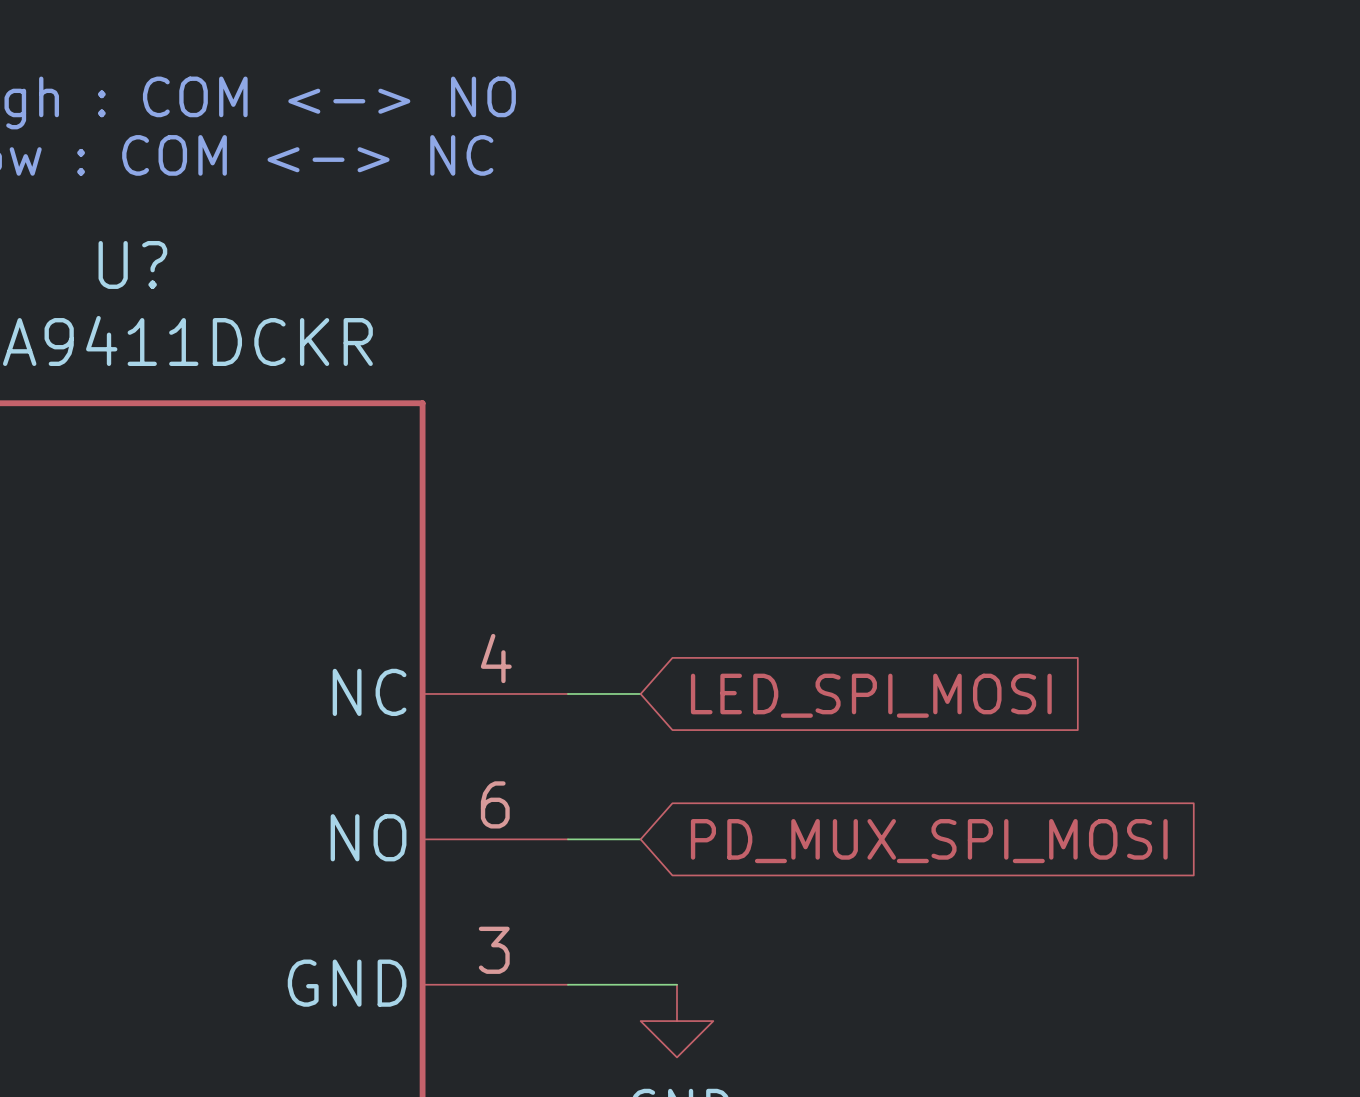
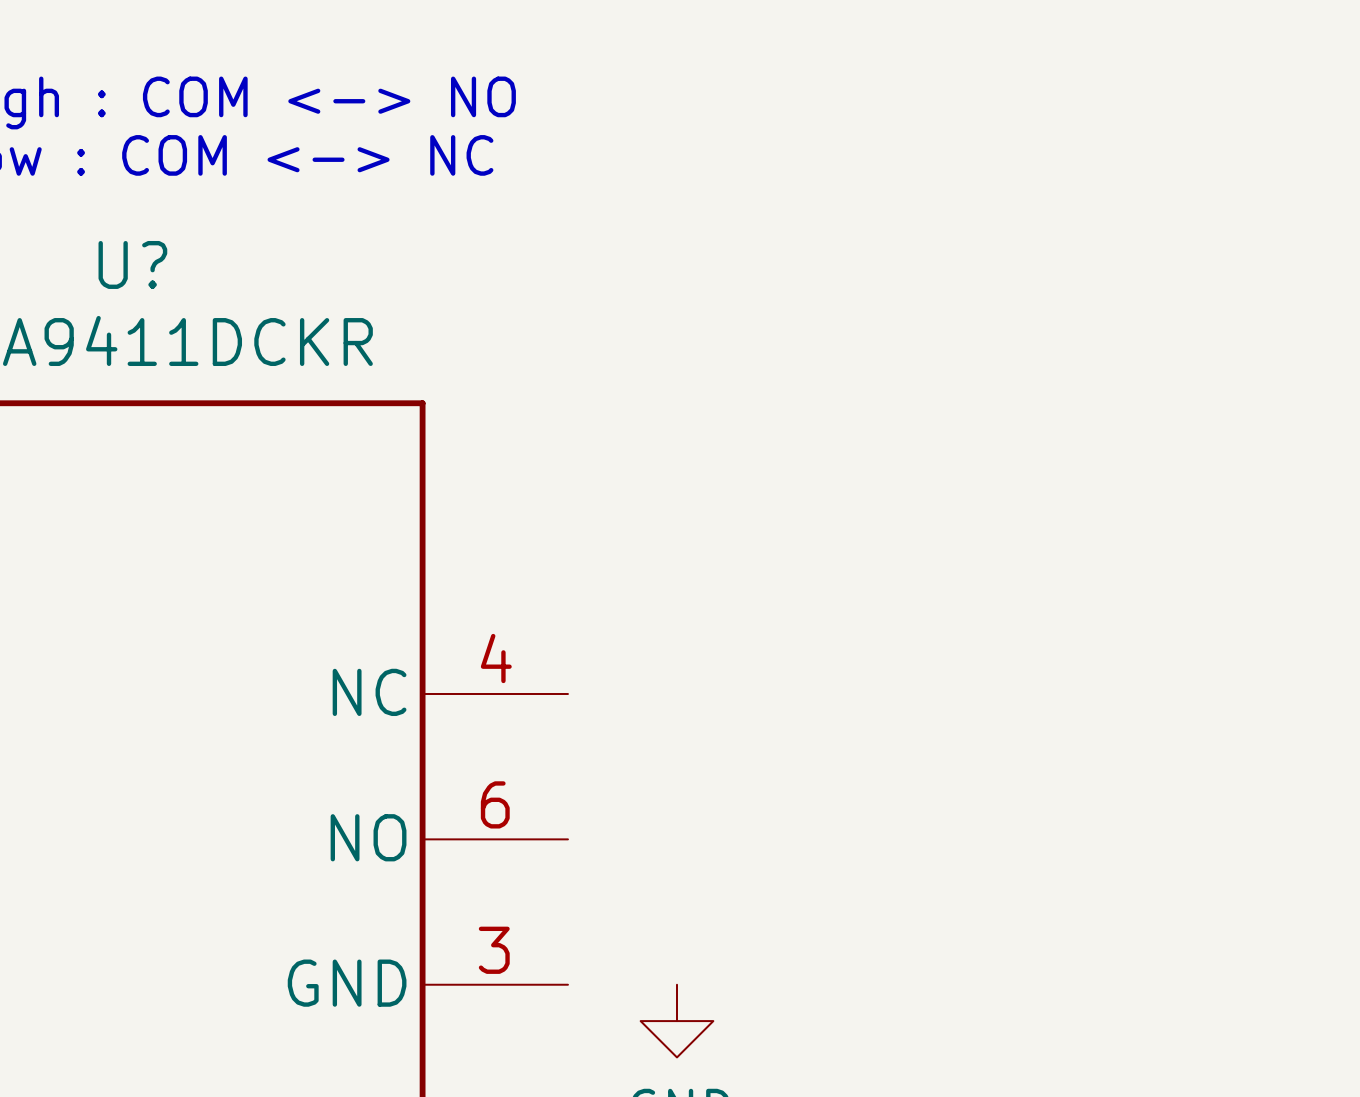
wire: (567, 693) (640, 693) -> none
global label: LED_SPI_MOSI (871, 695) -> none
wire: (567, 839) (640, 839) -> none
global label: PD_MUX_SPI_MOSI (929, 841) -> none
wire: (567, 984) (676, 984) -> none

